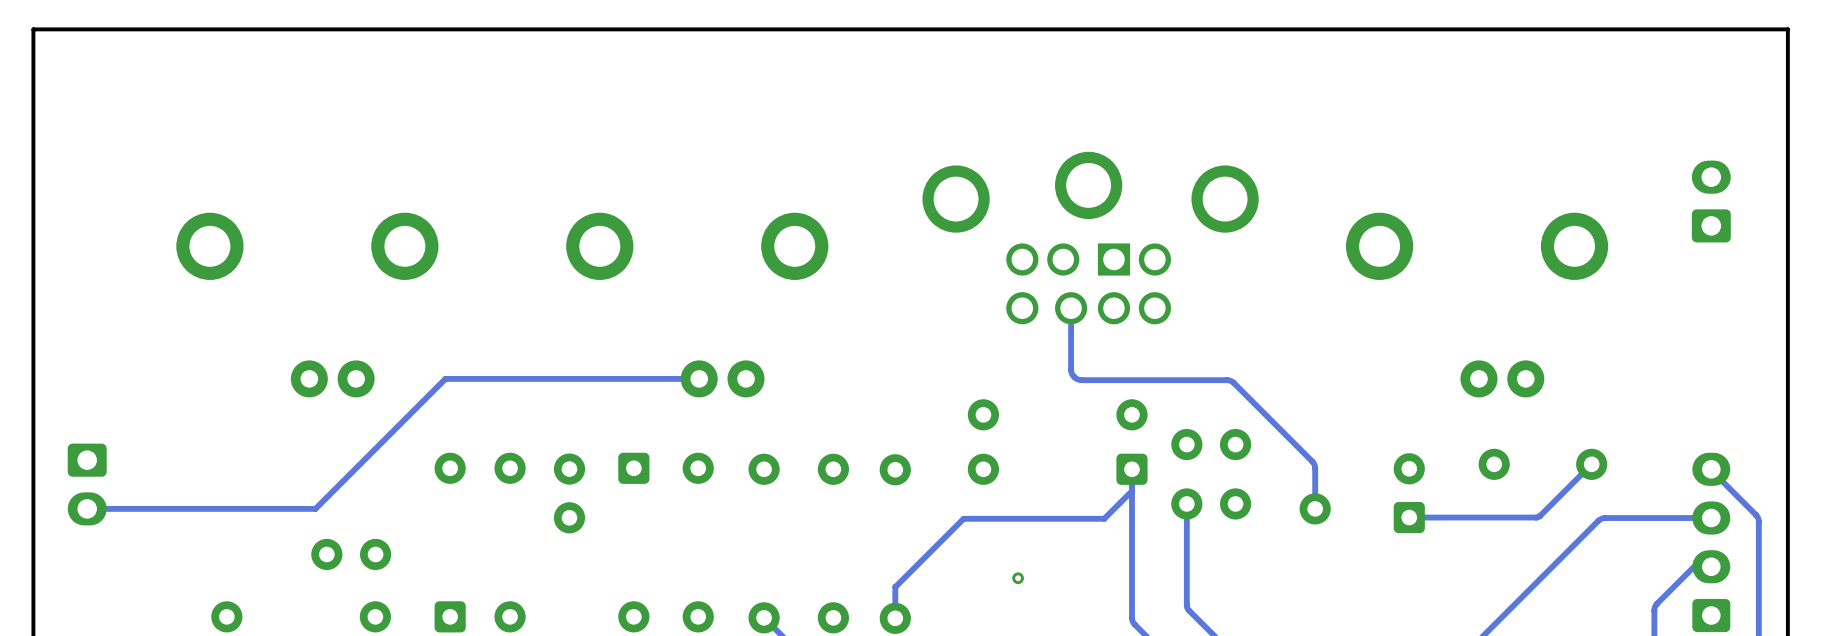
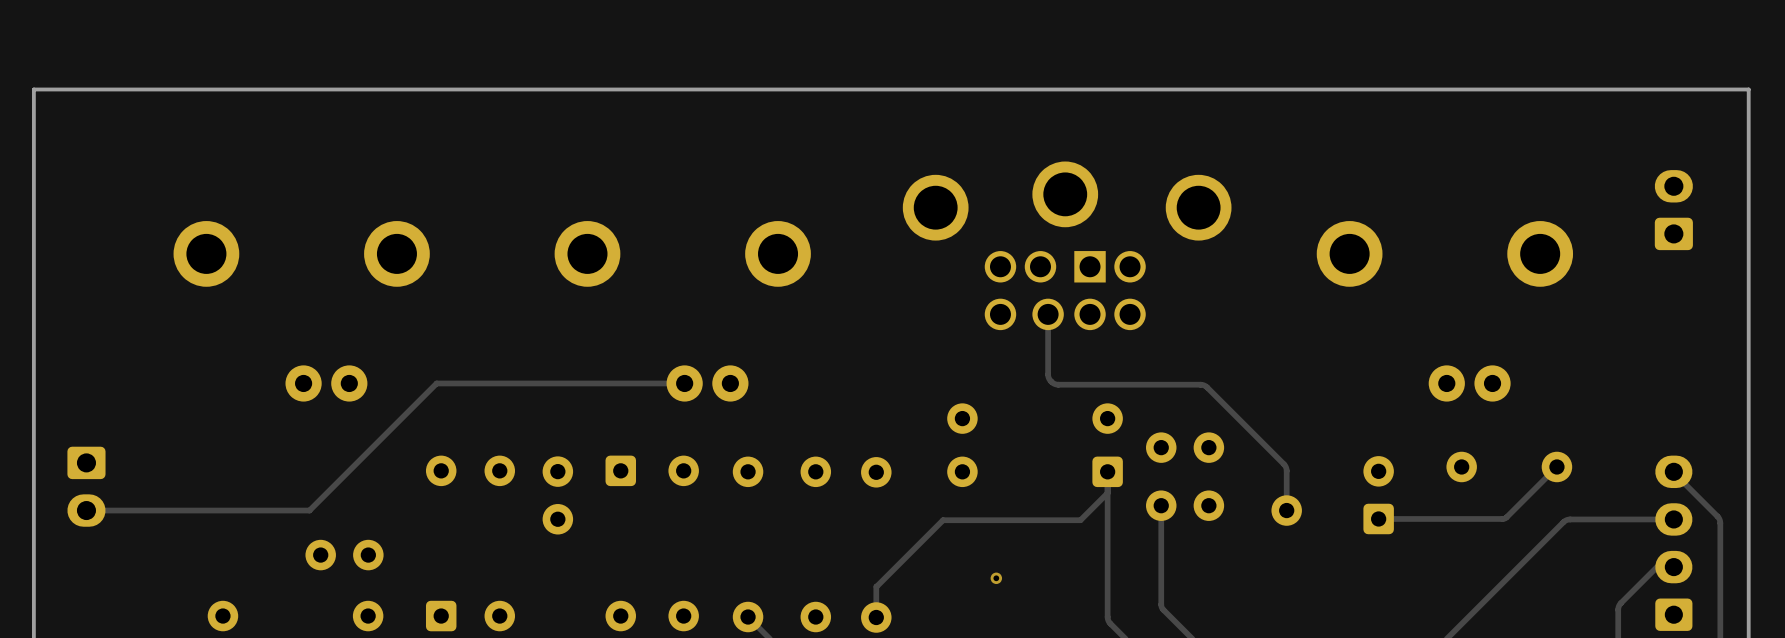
board edge: (1787, 78) (1787, 29) (33, 29) (33, 78) -> (1748, 89) (33, 89)

